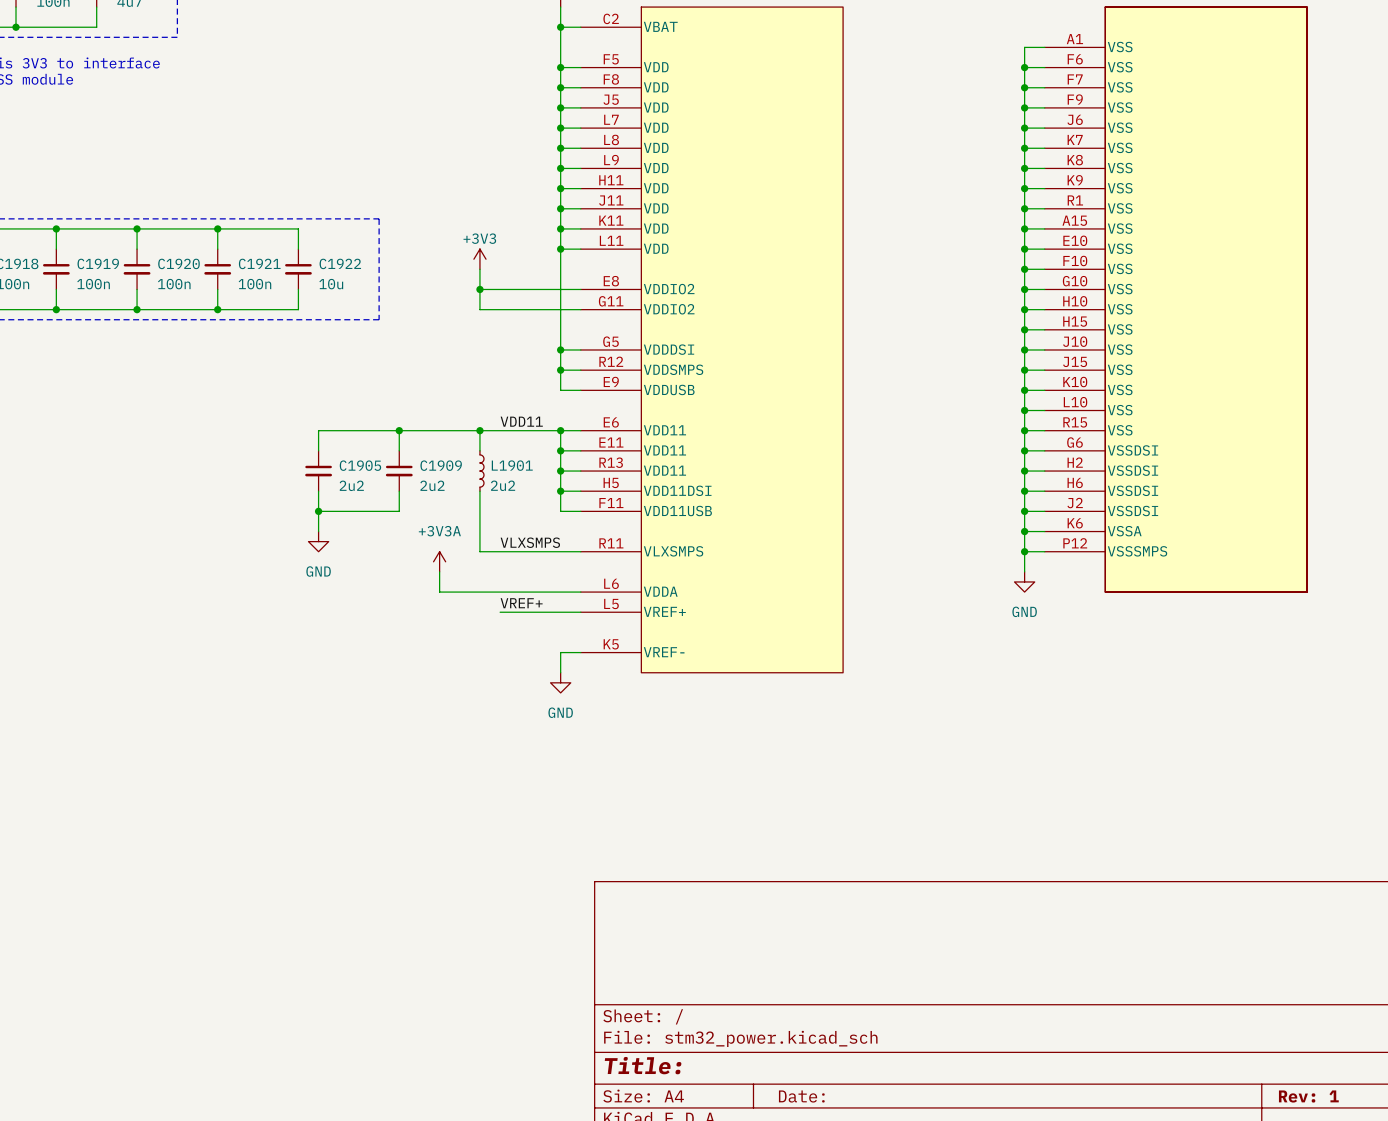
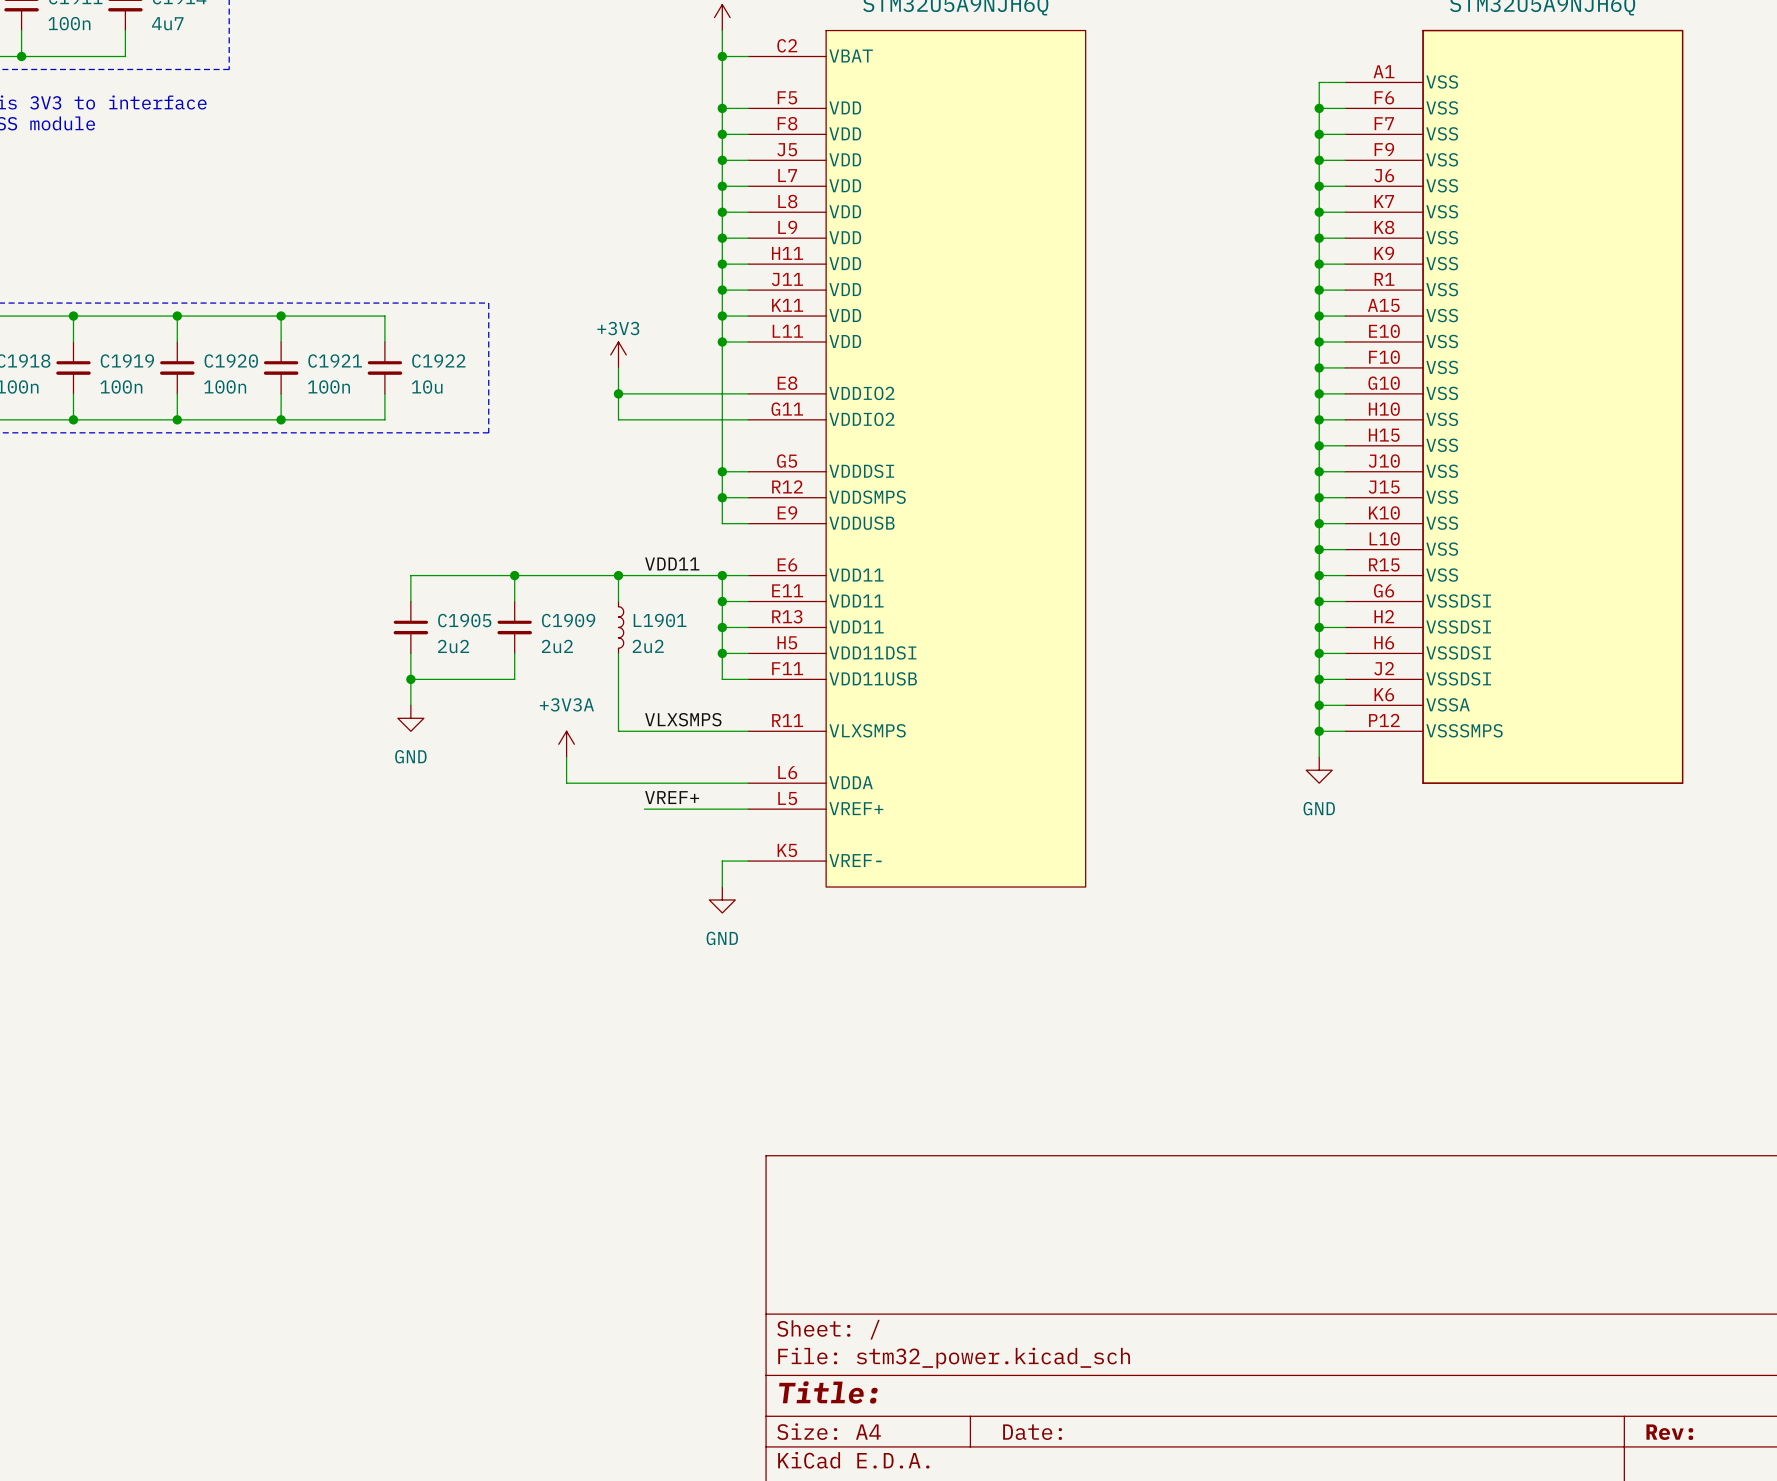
title block: Rev: 1 (1308, 1096) -> Rev: (1669, 1432)

